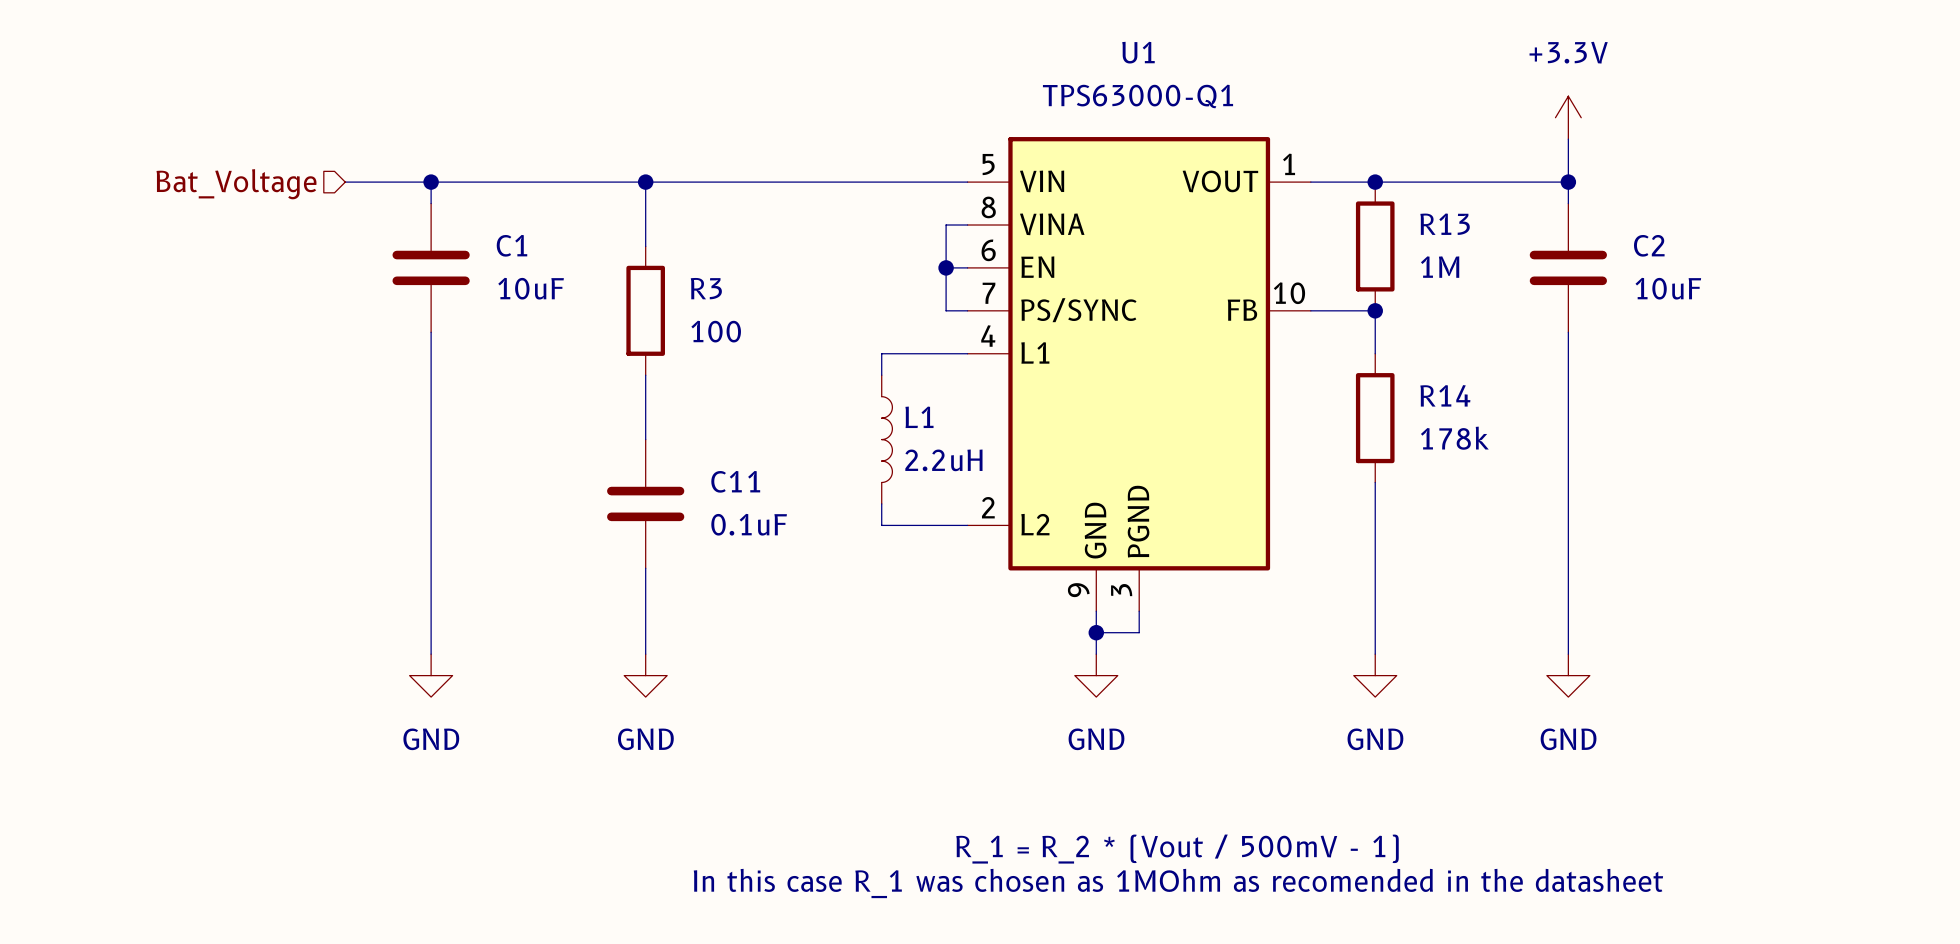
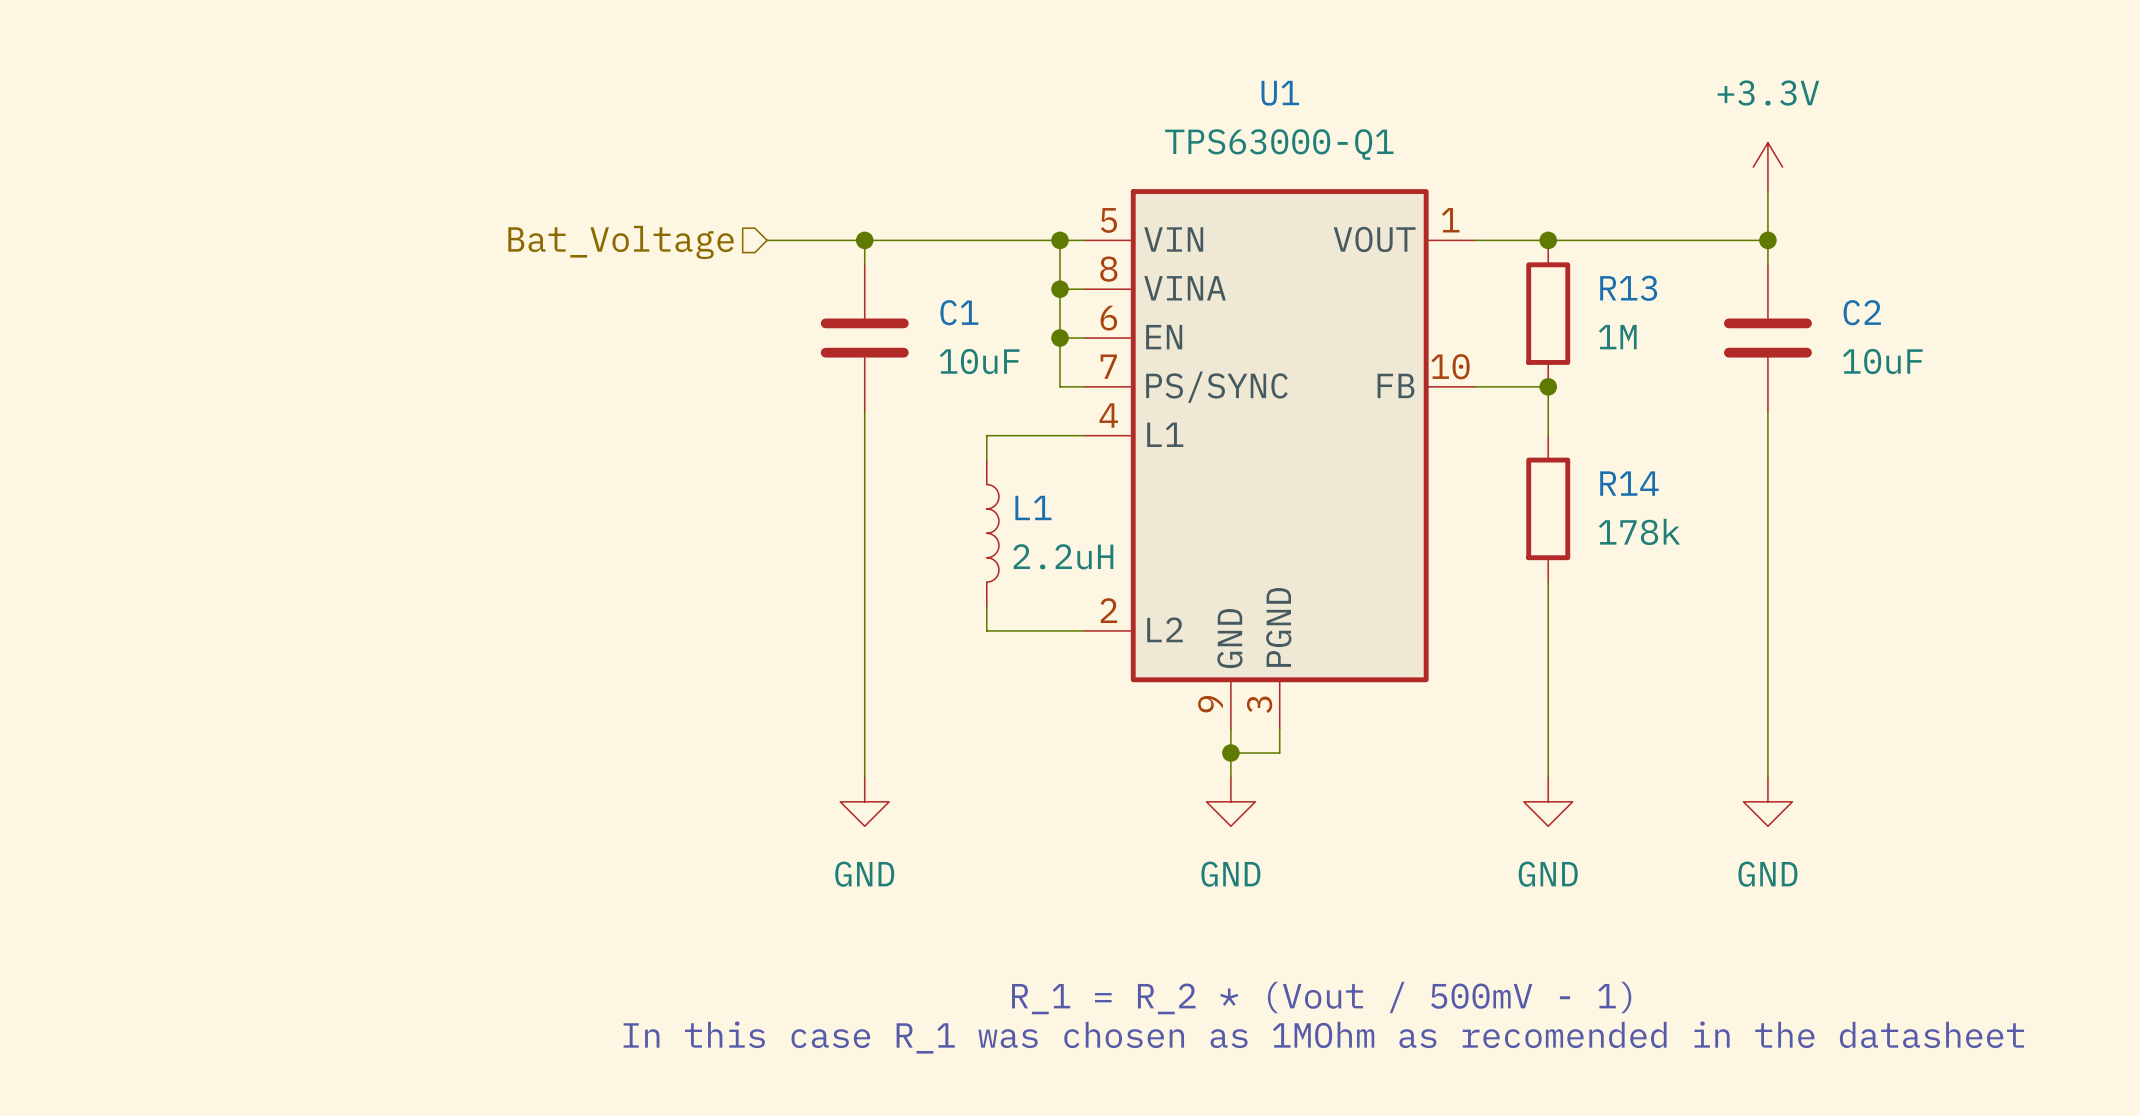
wire: (345, 182) (688, 182) -> none
wire: (431, 182) (431, 203) -> (864, 240) (864, 264)
junction: (431, 182) -> none
wire: (645, 182) (645, 246) -> none
junction: (645, 182) -> none
junction: none -> (864, 240)
wire: none -> (1060, 240) (1060, 289)
junction: none -> (1060, 240)
hierarchical label position: Bat_Voltage (236, 184) -> Bat_Voltage (621, 242)
junction: none -> (1060, 289)
C1 position: (431, 267) -> (864, 338)
R3: 100 (645, 310) -> none
wire: (431, 332) (431, 654) -> (864, 411) (864, 777)
wire: (645, 375) (645, 439) -> none
C11: 0.1uF (645, 503) -> none
wire: (645, 568) (645, 654) -> none
power symbol: GND (431, 675) -> none
power symbol position: GND (645, 675) -> GND (864, 801)

